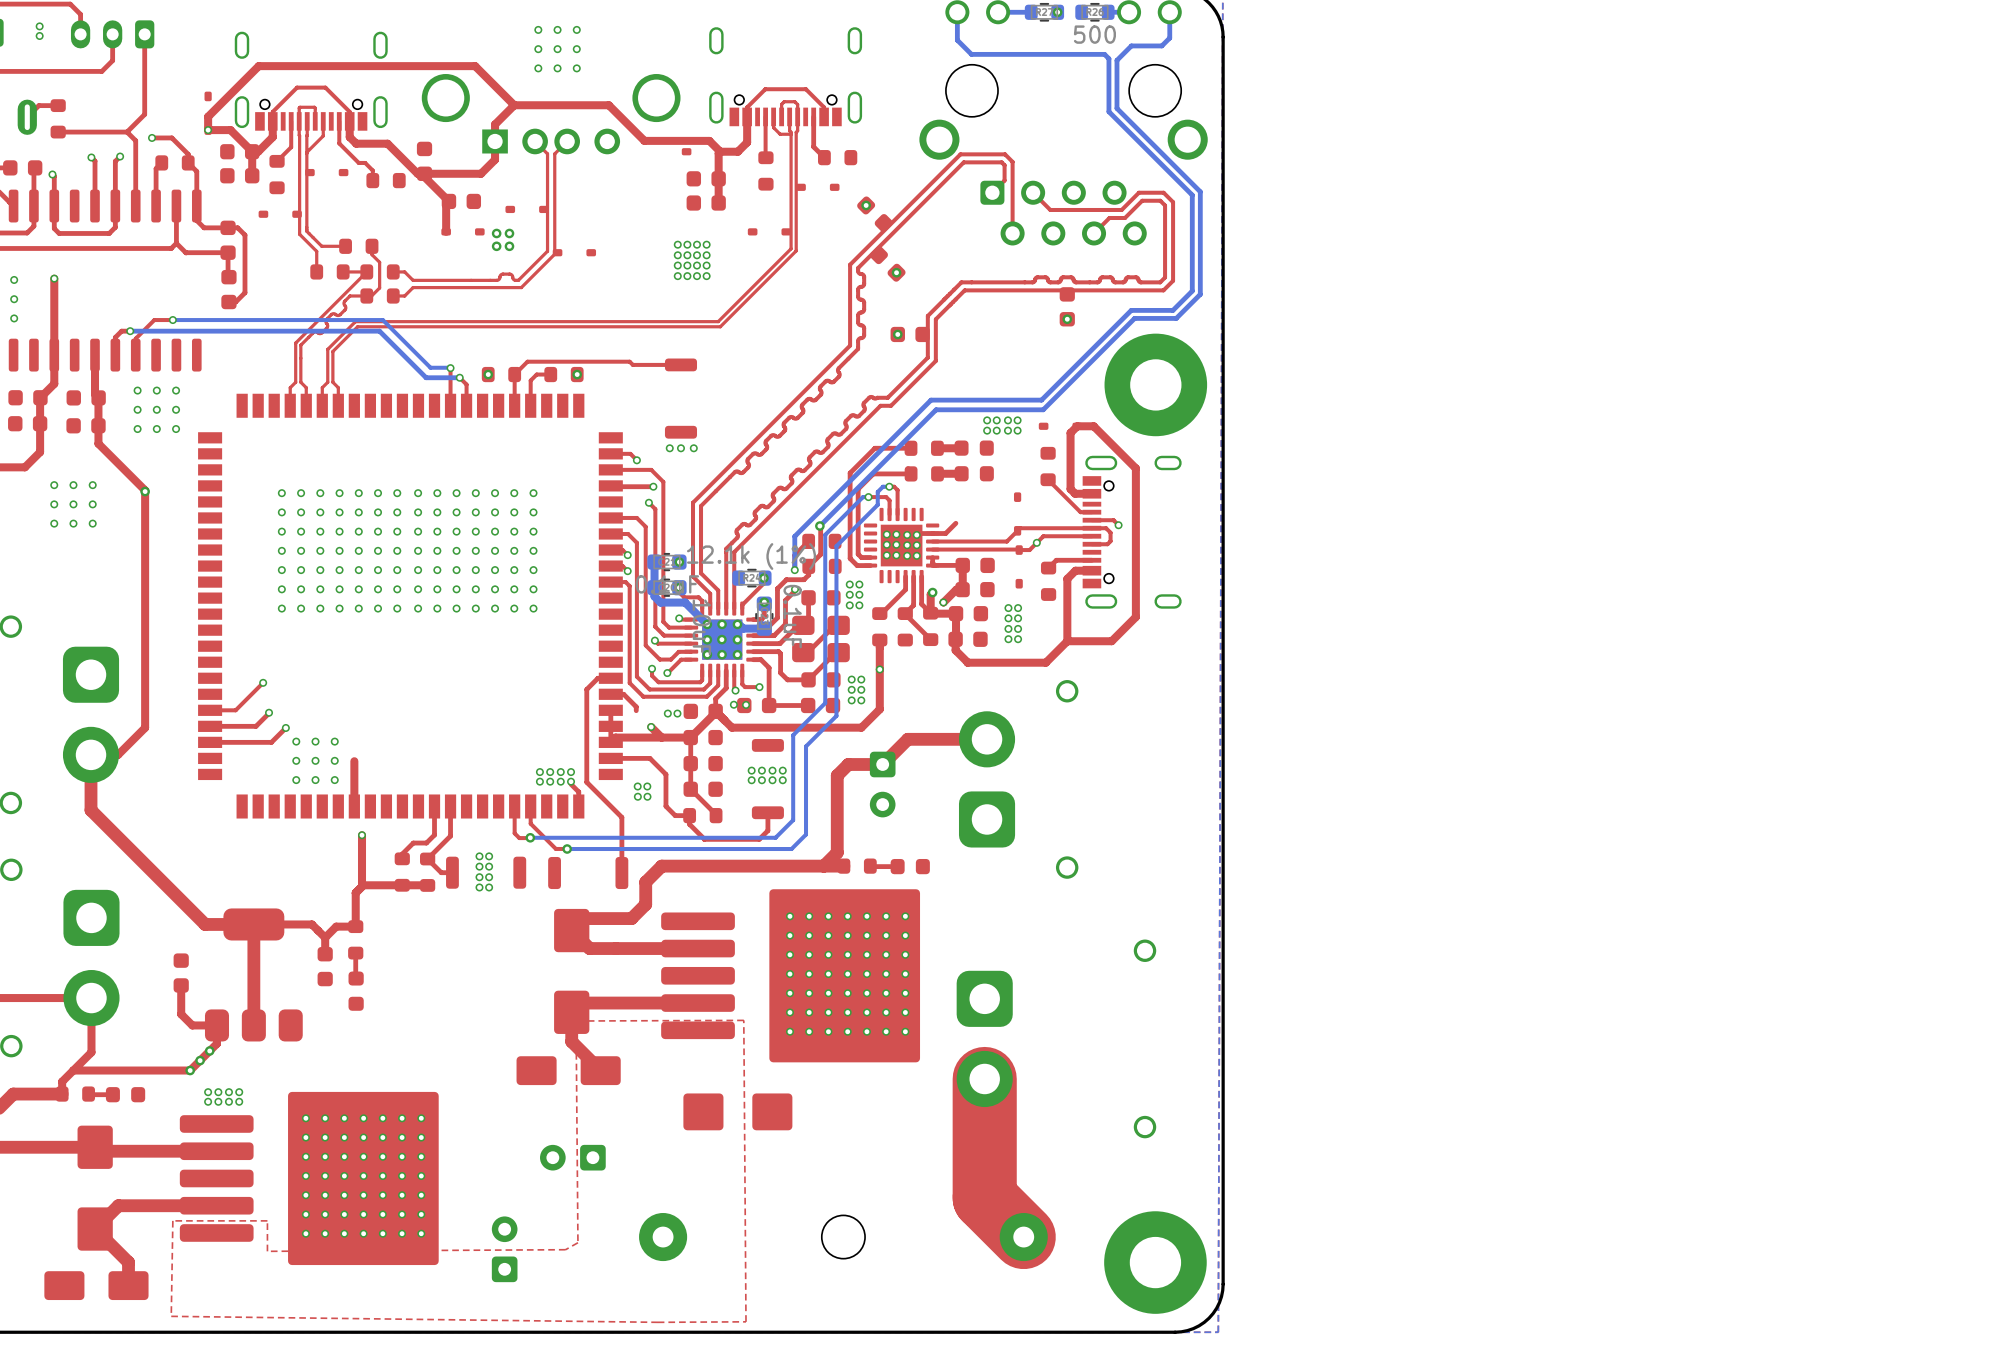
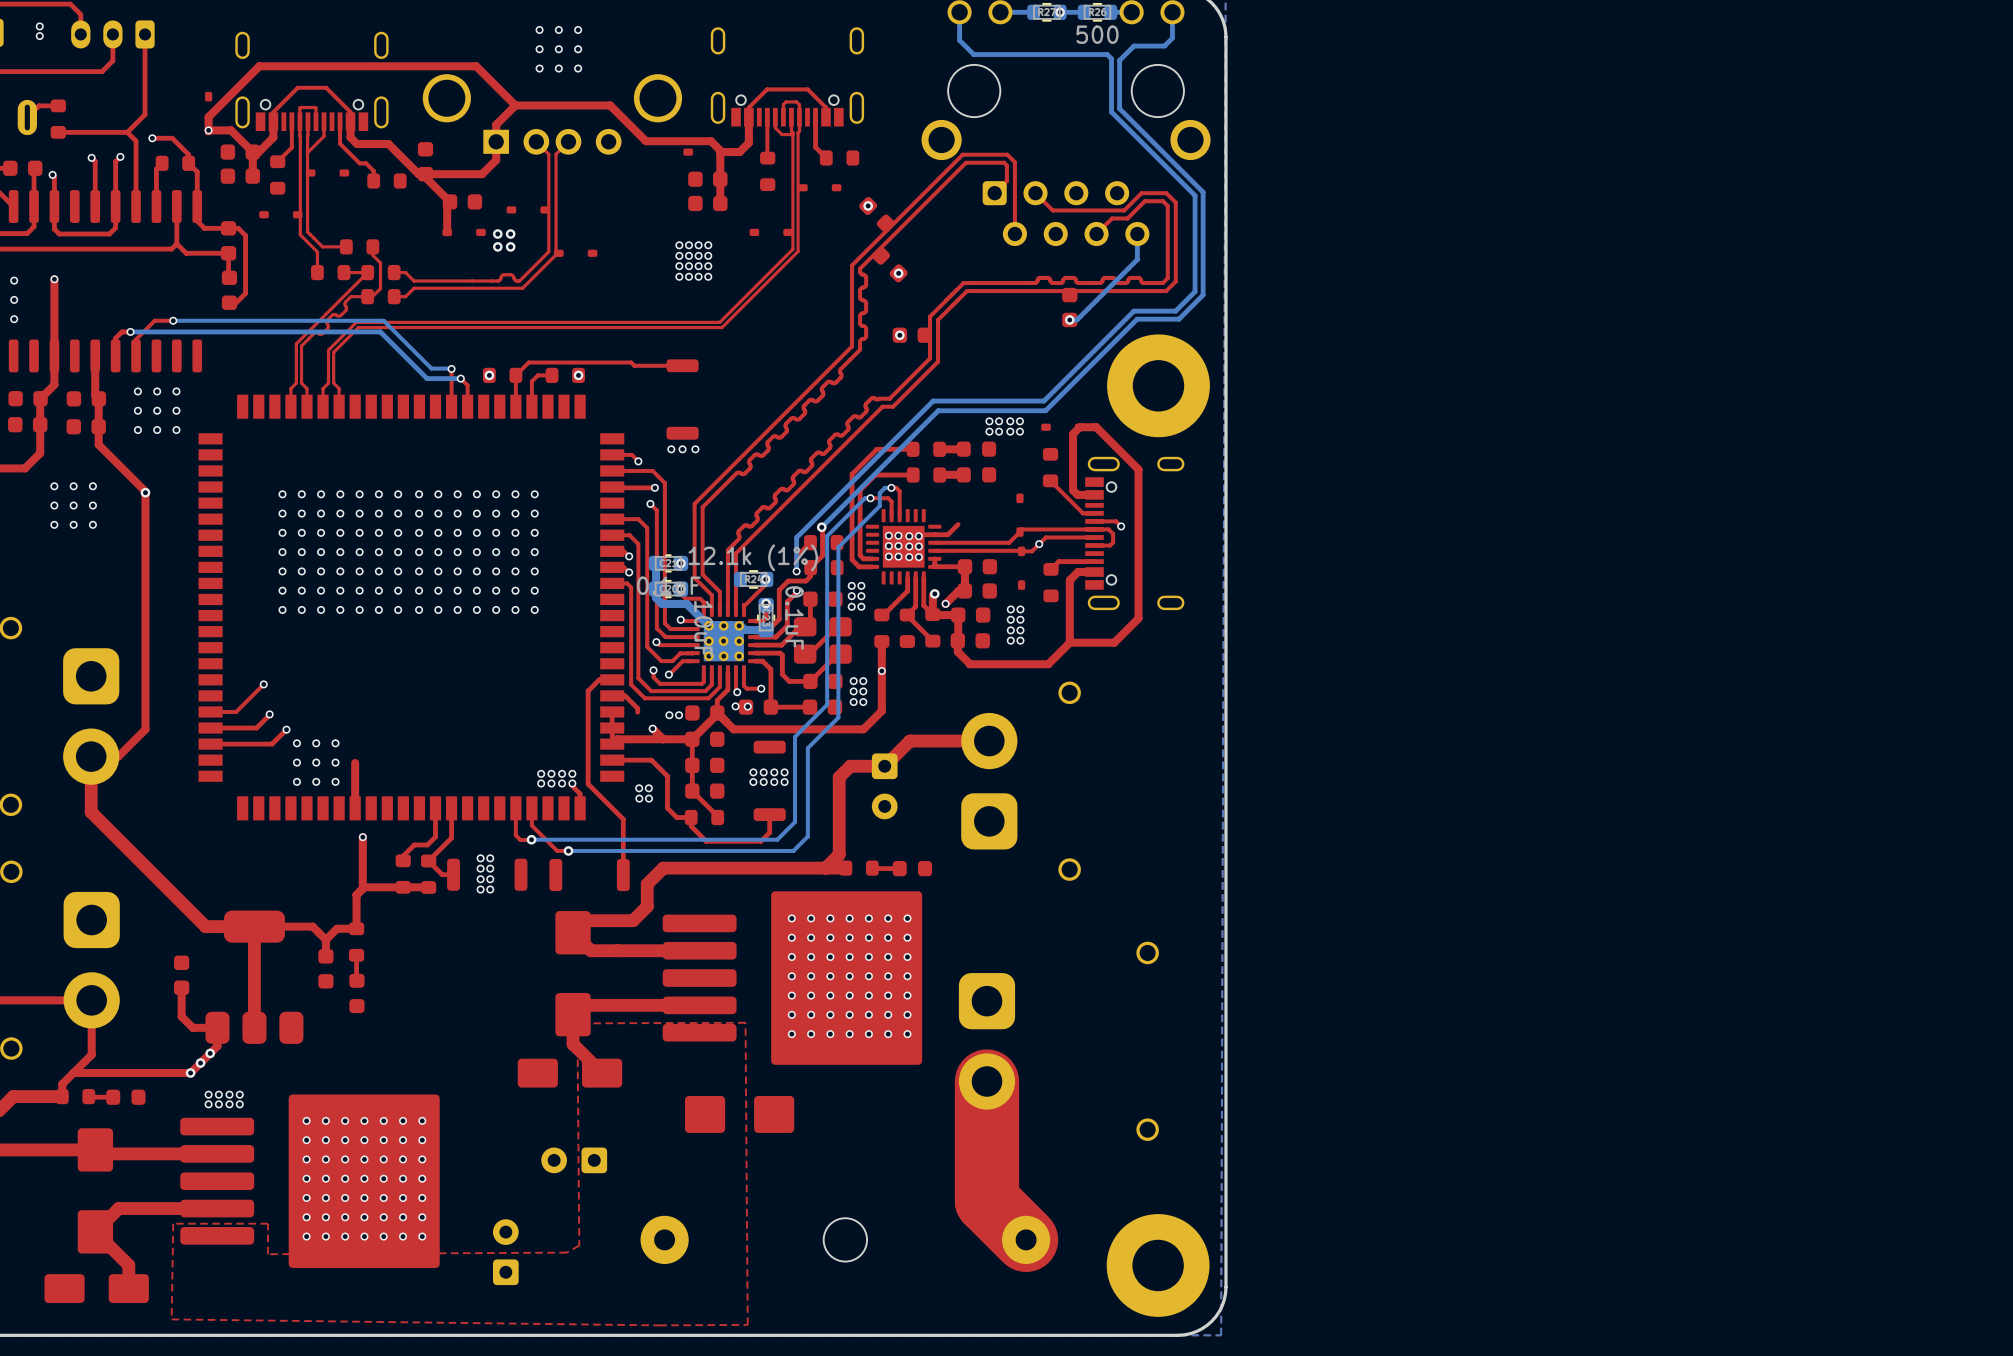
bottom track: none -> (1084, 12) (1060, 12)
bottom track: none -> (1137, 233) (1137, 259) (1076, 319) (1069, 319)

